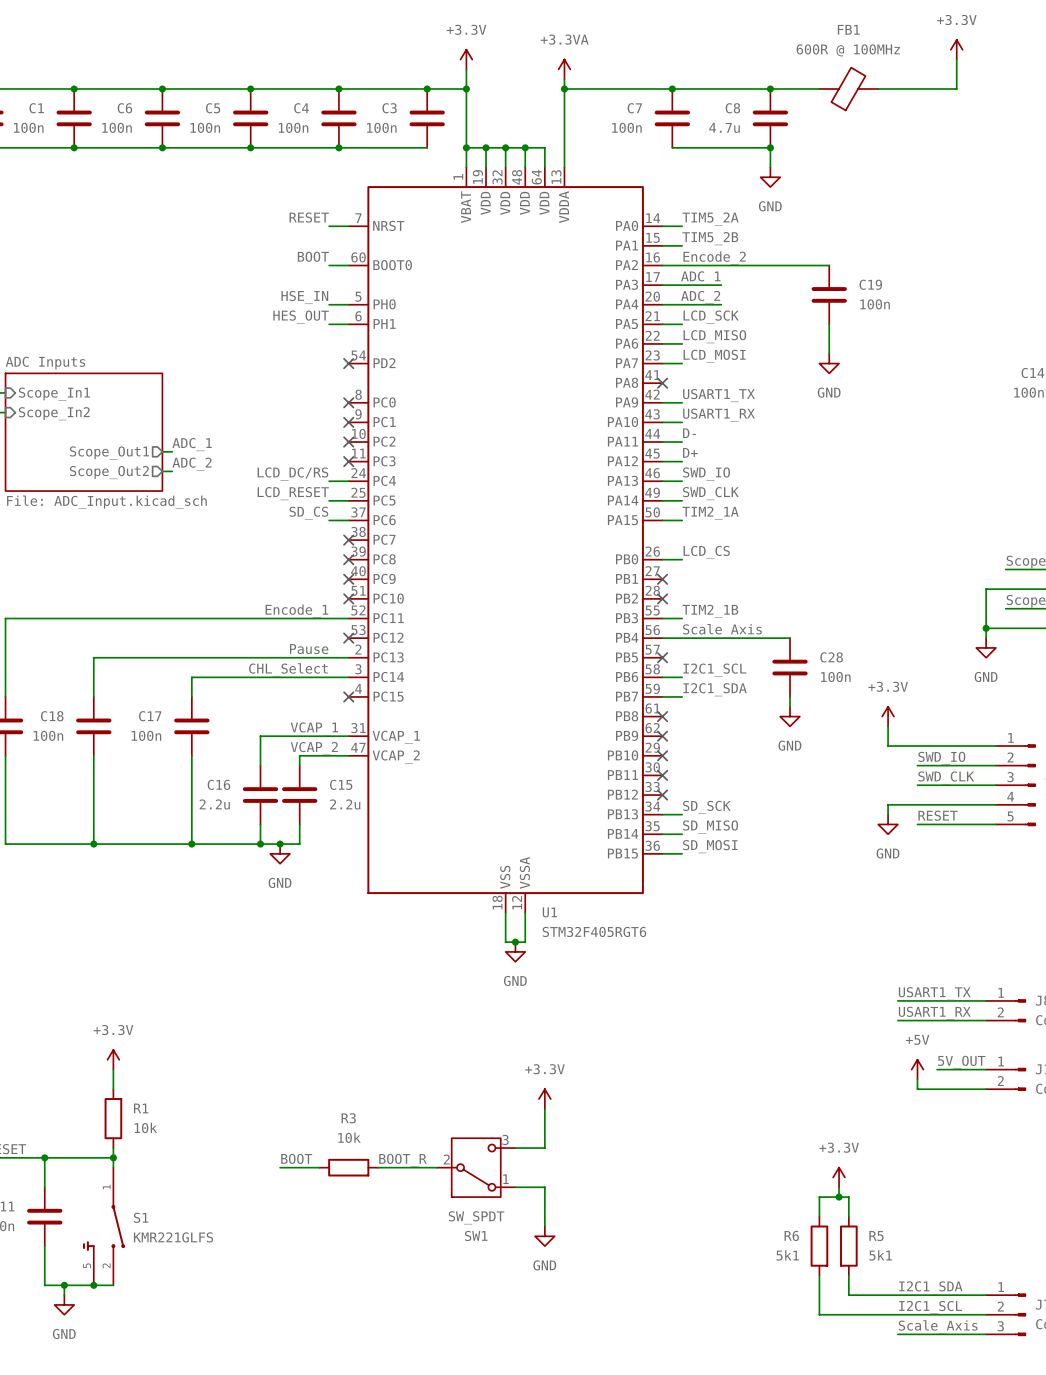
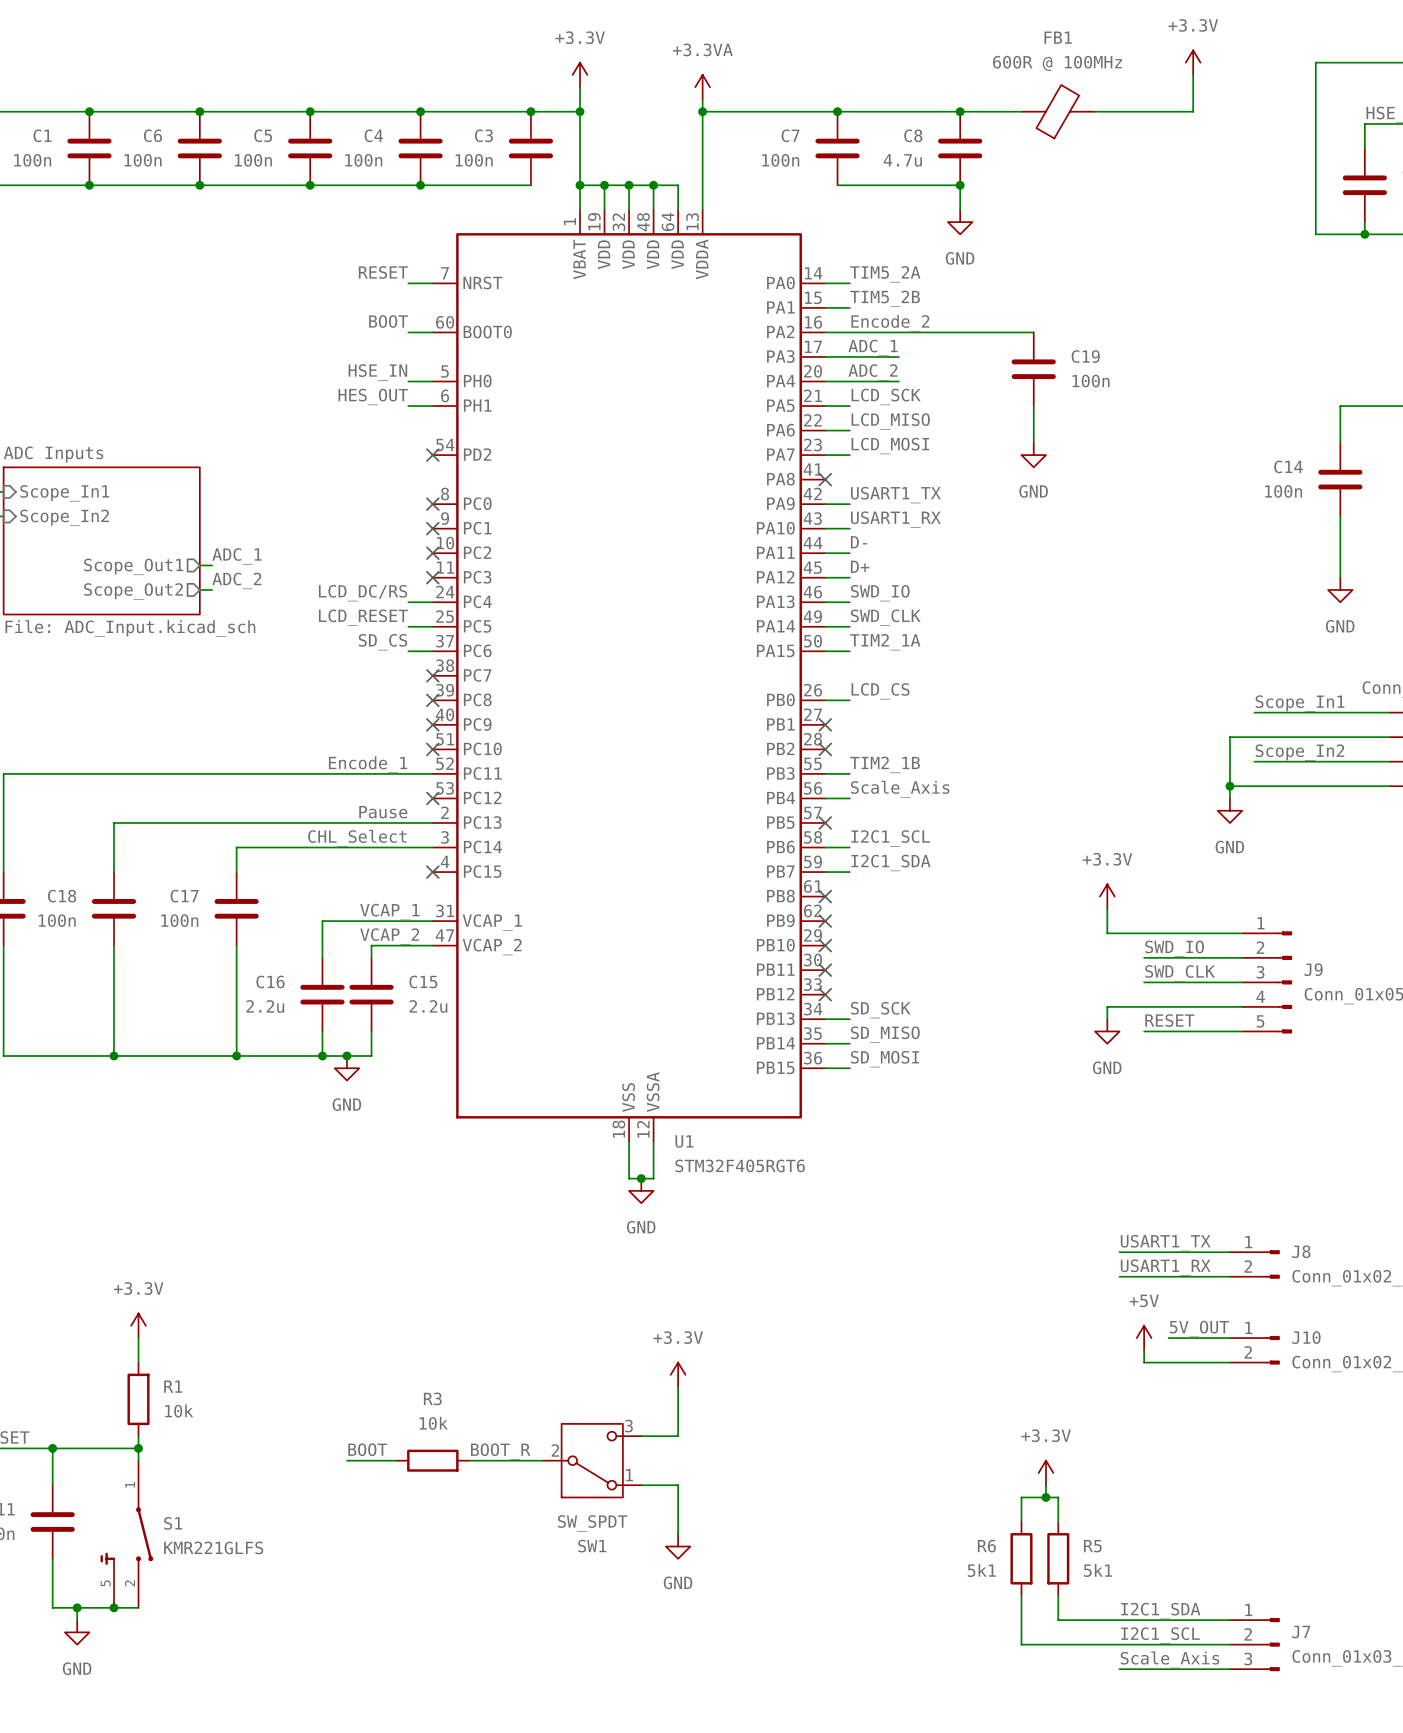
wire: (682, 638) (790, 638) -> none
C28: 100n (790, 667) -> none
wire: (790, 696) (790, 706) -> none
power symbol: GND (790, 716) -> none

